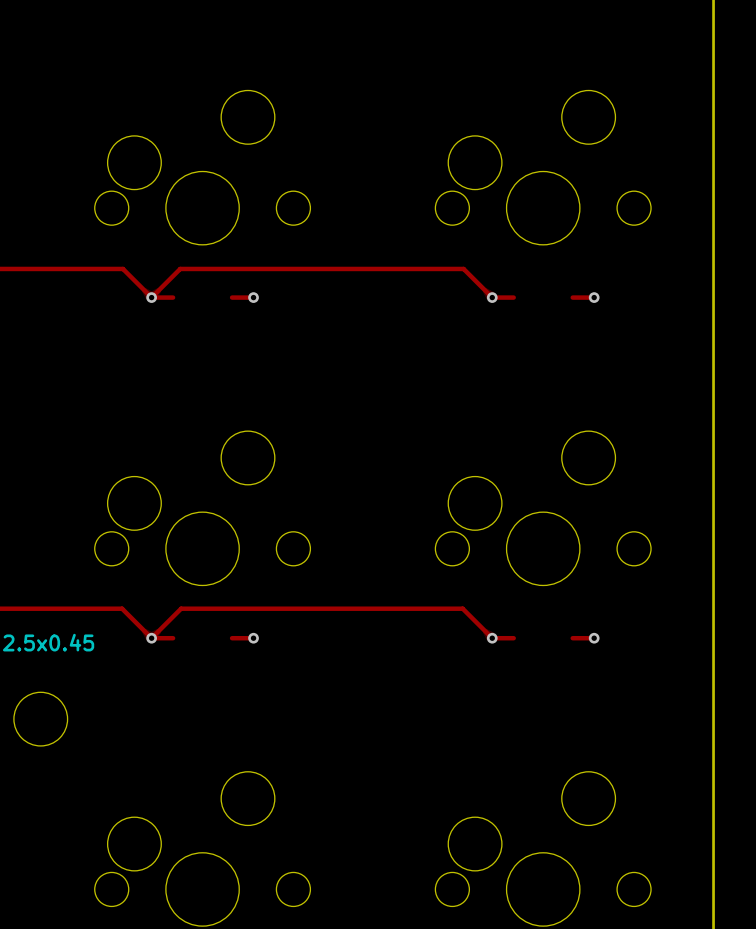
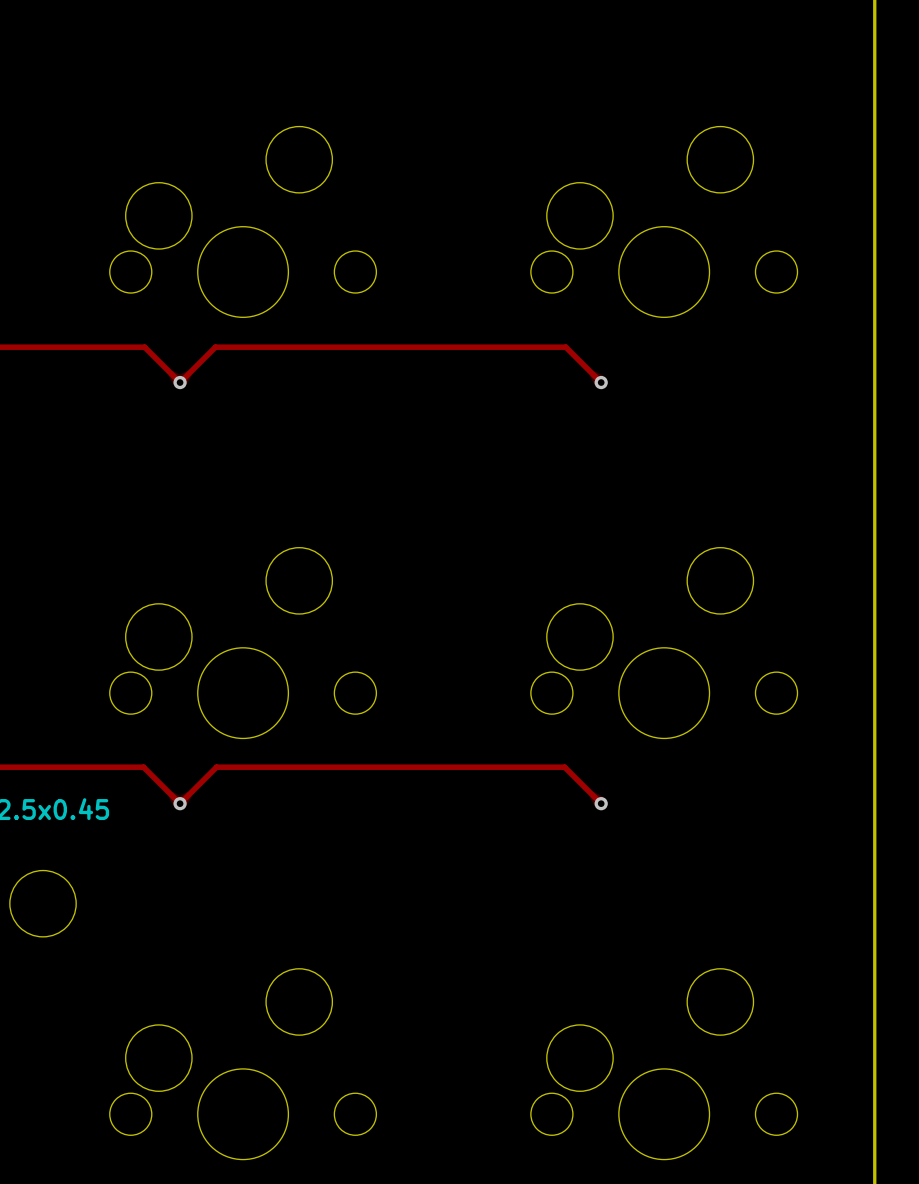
track: (151, 297) (173, 297) -> none
track: (232, 297) (253, 297) -> none
via: (253, 297) -> none
track: (492, 297) (513, 297) -> none
track: (572, 297) (594, 297) -> none
via: (594, 297) -> none
track: (151, 638) (173, 638) -> none
track: (232, 638) (253, 638) -> none
via: (253, 638) -> none
track: (492, 638) (513, 638) -> none
track: (572, 638) (594, 638) -> none
via: (594, 638) -> none

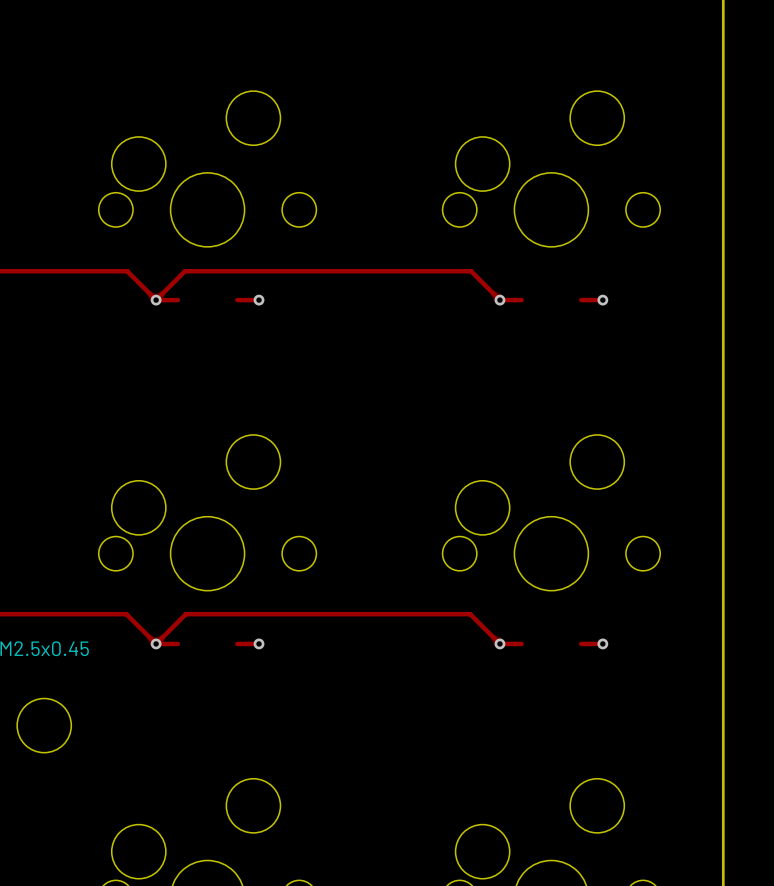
track: none -> (156, 300) (177, 300)
track: none -> (237, 300) (259, 300)
via: none -> (259, 300)
track: none -> (499, 300) (521, 300)
track: none -> (581, 300) (602, 300)
via: none -> (602, 300)
track: none -> (156, 643) (177, 643)
track: none -> (237, 643) (259, 643)
via: none -> (259, 643)
track: none -> (499, 643) (521, 643)
track: none -> (581, 643) (602, 643)
via: none -> (602, 643)

